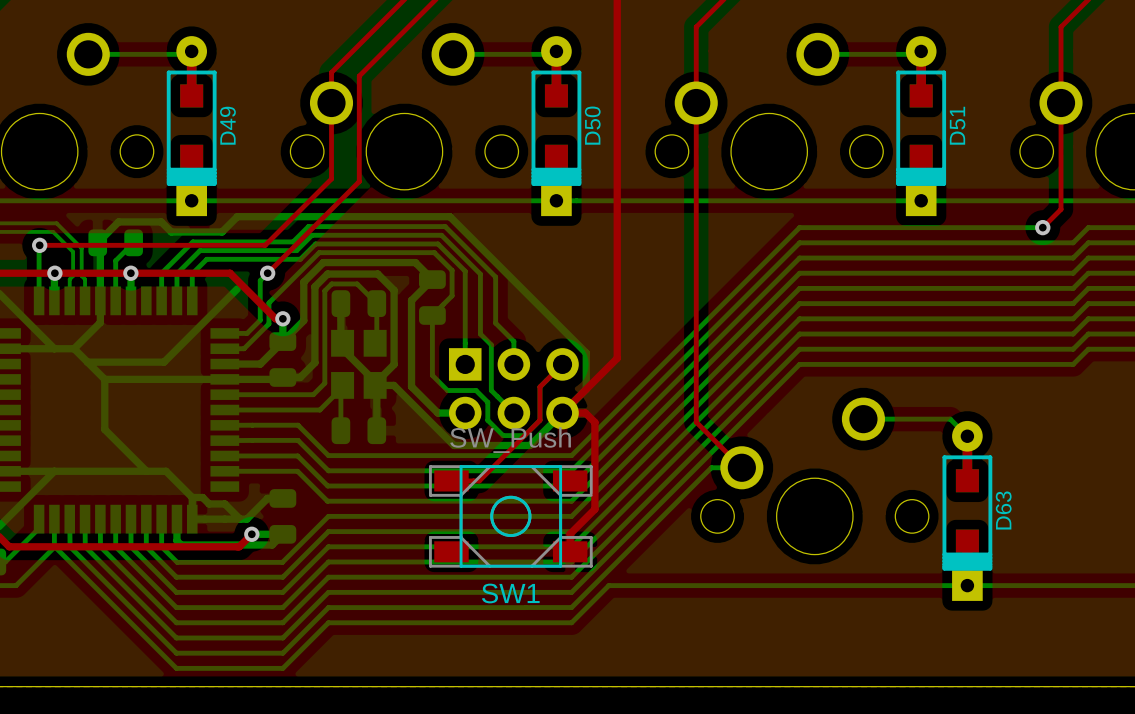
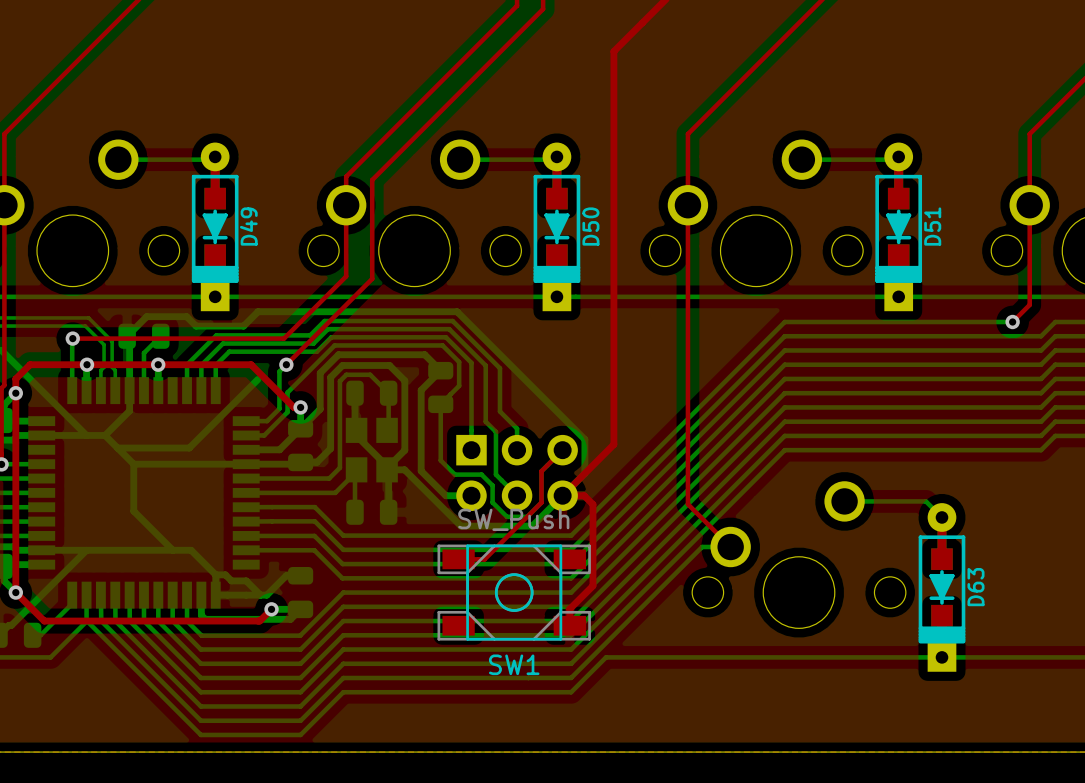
D49 footprint: [166, 36, 217, 217] -> [191, 142, 239, 312]
D50 footprint: [531, 36, 582, 217] -> [533, 142, 581, 312]
D51 footprint: [896, 36, 947, 217] -> [875, 142, 923, 312]
D63 footprint: [942, 420, 993, 601] -> [918, 503, 966, 672]

